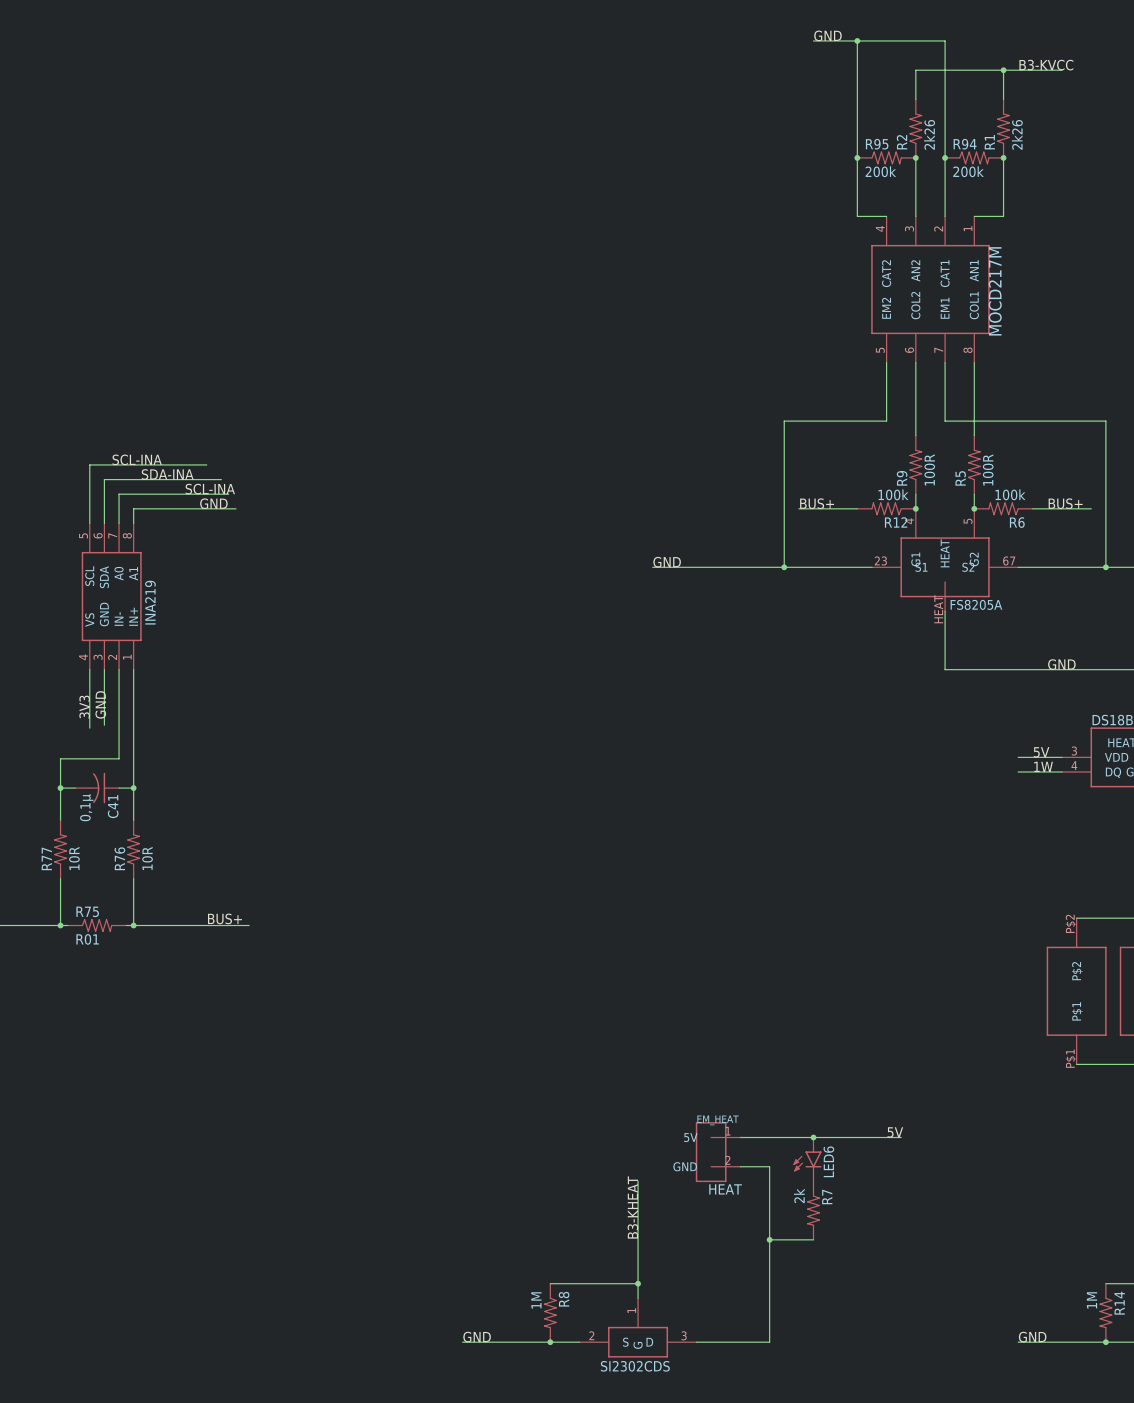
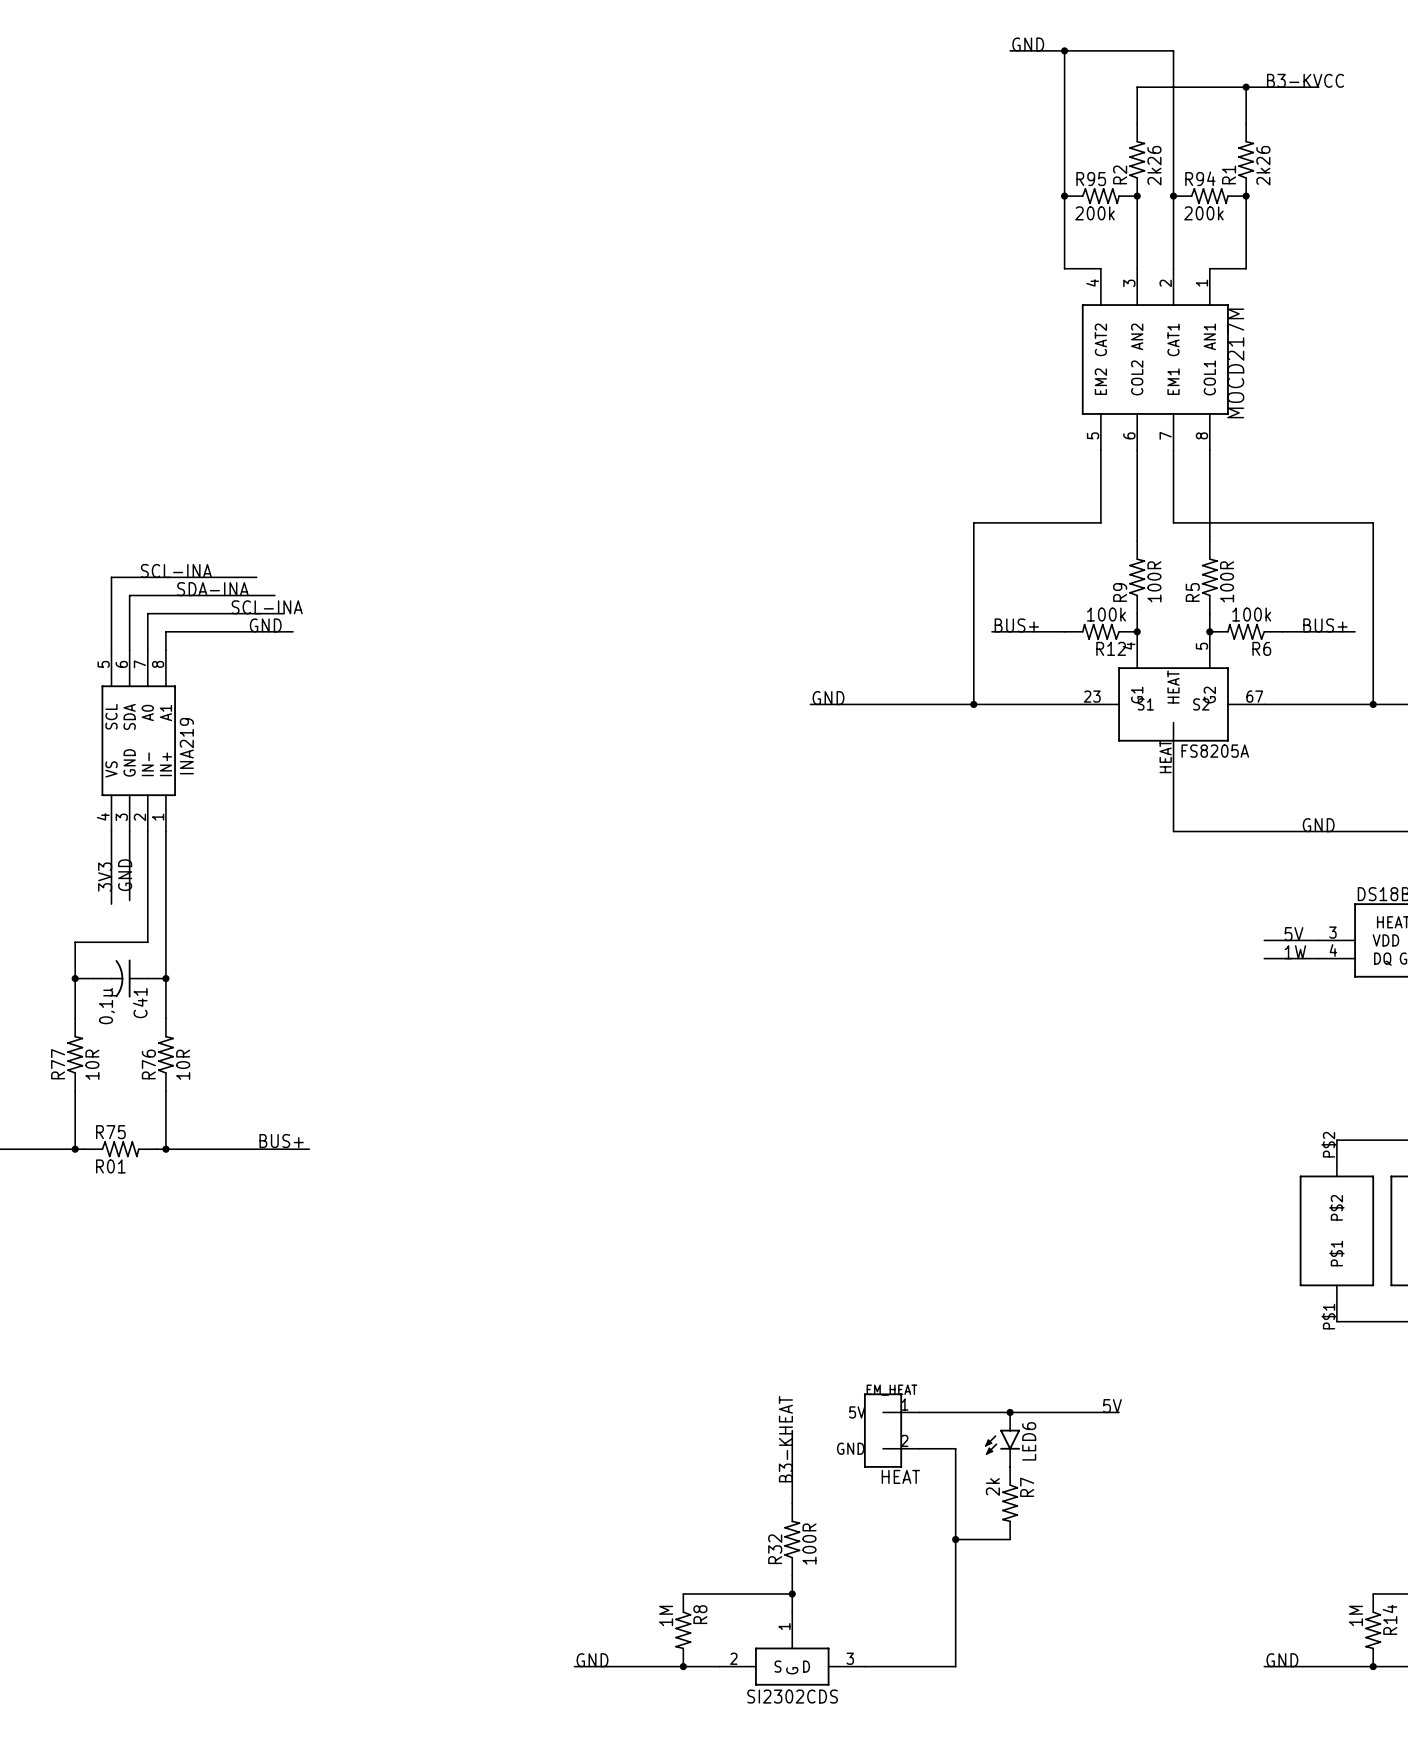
wire: none -> (792, 1430) (792, 1466)
label position: B3-KHEAT (632, 1207) -> B3-KHEAT (785, 1439)
R32: none -> 100R (792, 1539)

